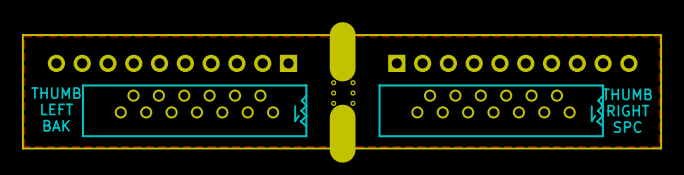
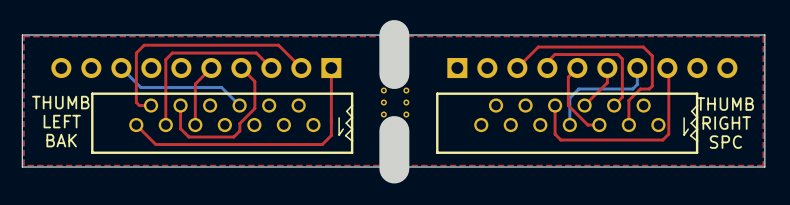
bottom track: none -> (121, 68) (140, 87) (221, 87) (239, 105)
top track: none -> (211, 68) (195, 84) (195, 125)
top track: none -> (241, 68) (254, 81) (254, 108) (239, 123) (239, 131) (233, 137) (188, 137) (180, 128) (180, 105)
top track: none -> (271, 68) (256, 53) (172, 53) (165, 59) (165, 125)
top track: none -> (301, 68) (278, 45) (144, 45) (136, 53) (136, 102) (139, 105) (151, 105)
top track: none -> (331, 68) (331, 135) (322, 144) (155, 144) (136, 125)
top track: none -> (517, 68) (538, 47) (643, 47) (652, 56) (652, 86) (649, 89) (640, 89) (628, 100) (628, 125)
top track: none -> (547, 68) (547, 62) (554, 54) (617, 54) (622, 59) (622, 97) (614, 105)
top track: none -> (577, 68) (568, 77) (568, 105) (587, 125) (599, 125)
top track: none -> (607, 68) (607, 82) (584, 105)
bottom track: none -> (637, 68) (637, 84) (632, 89) (578, 89) (569, 98) (569, 125)
top track: none -> (667, 68) (668, 134) (662, 140) (560, 140) (555, 134) (555, 105)

